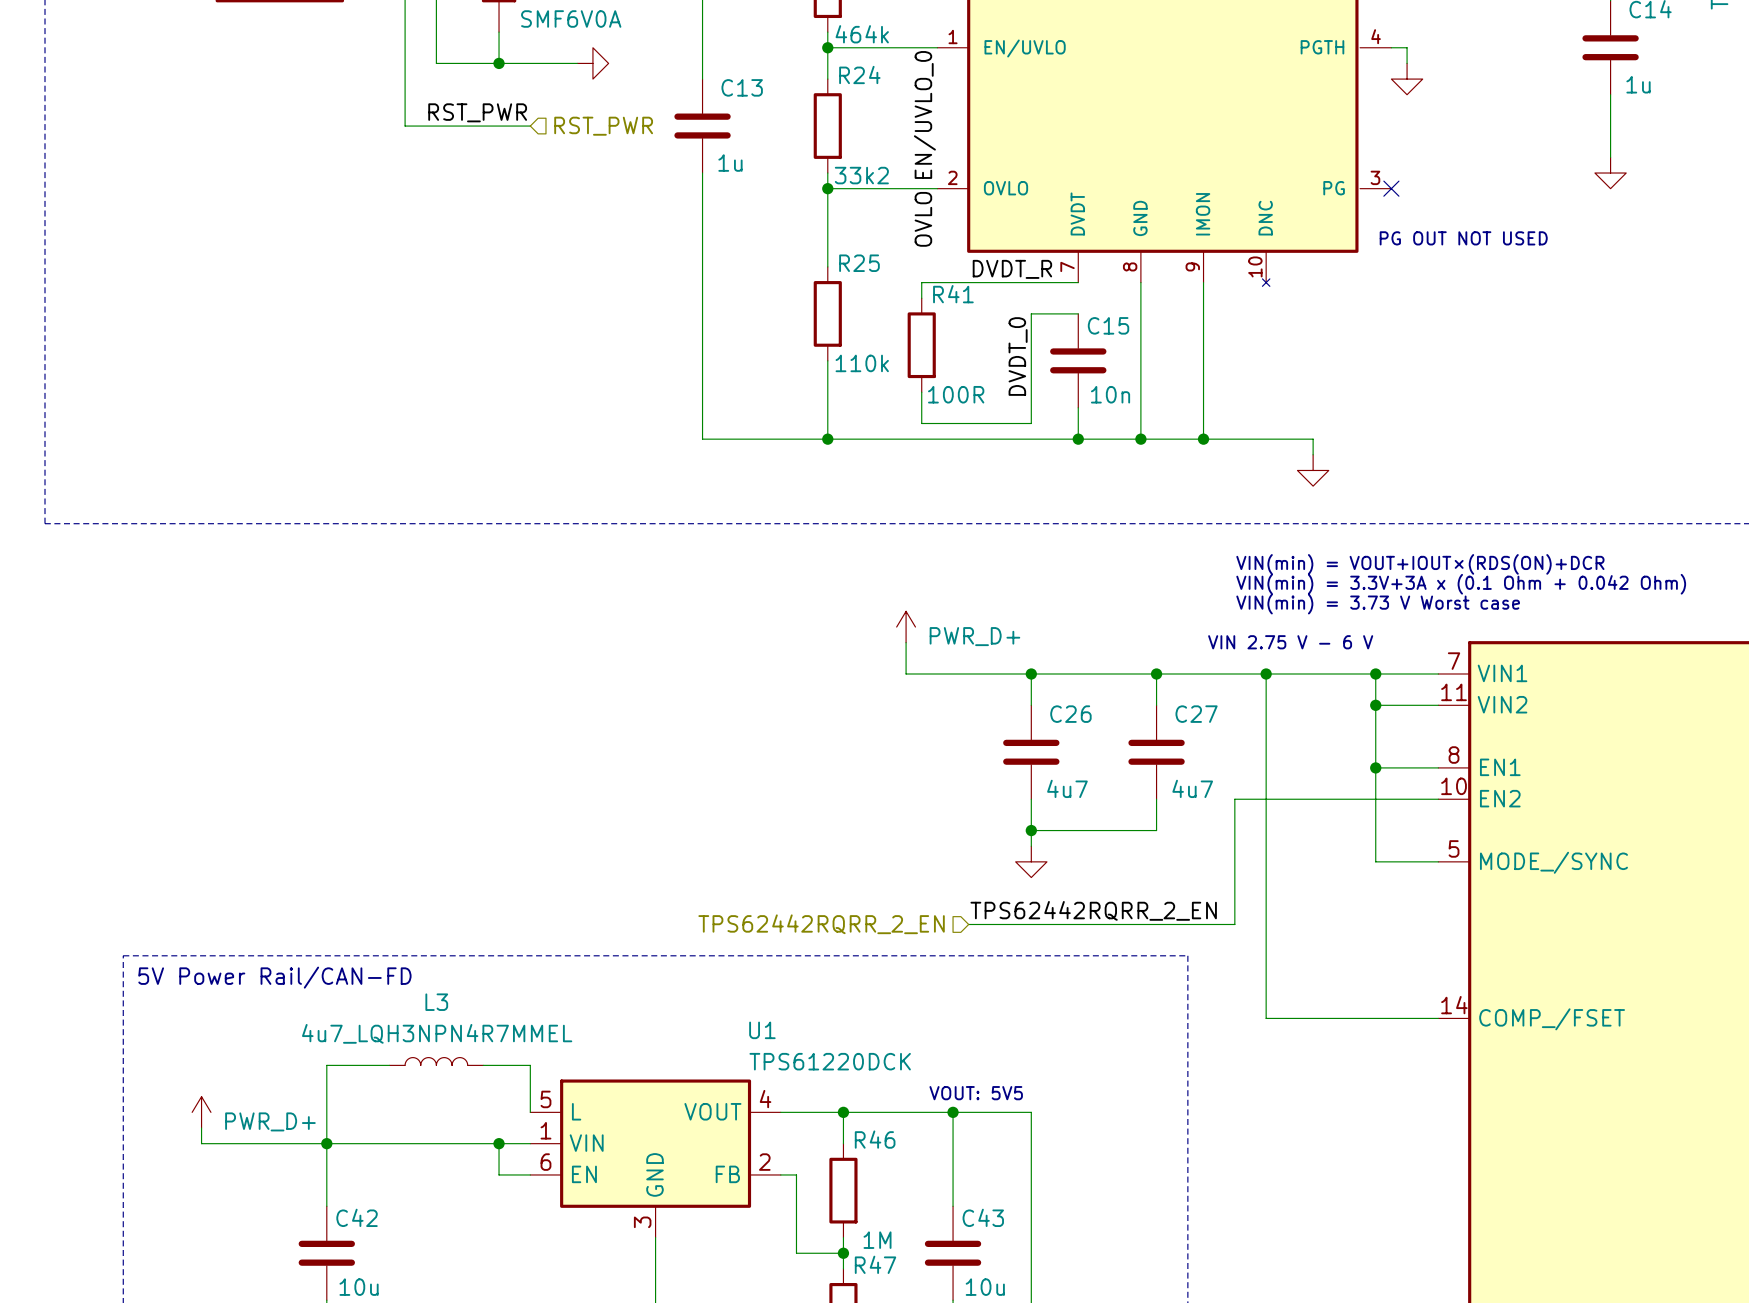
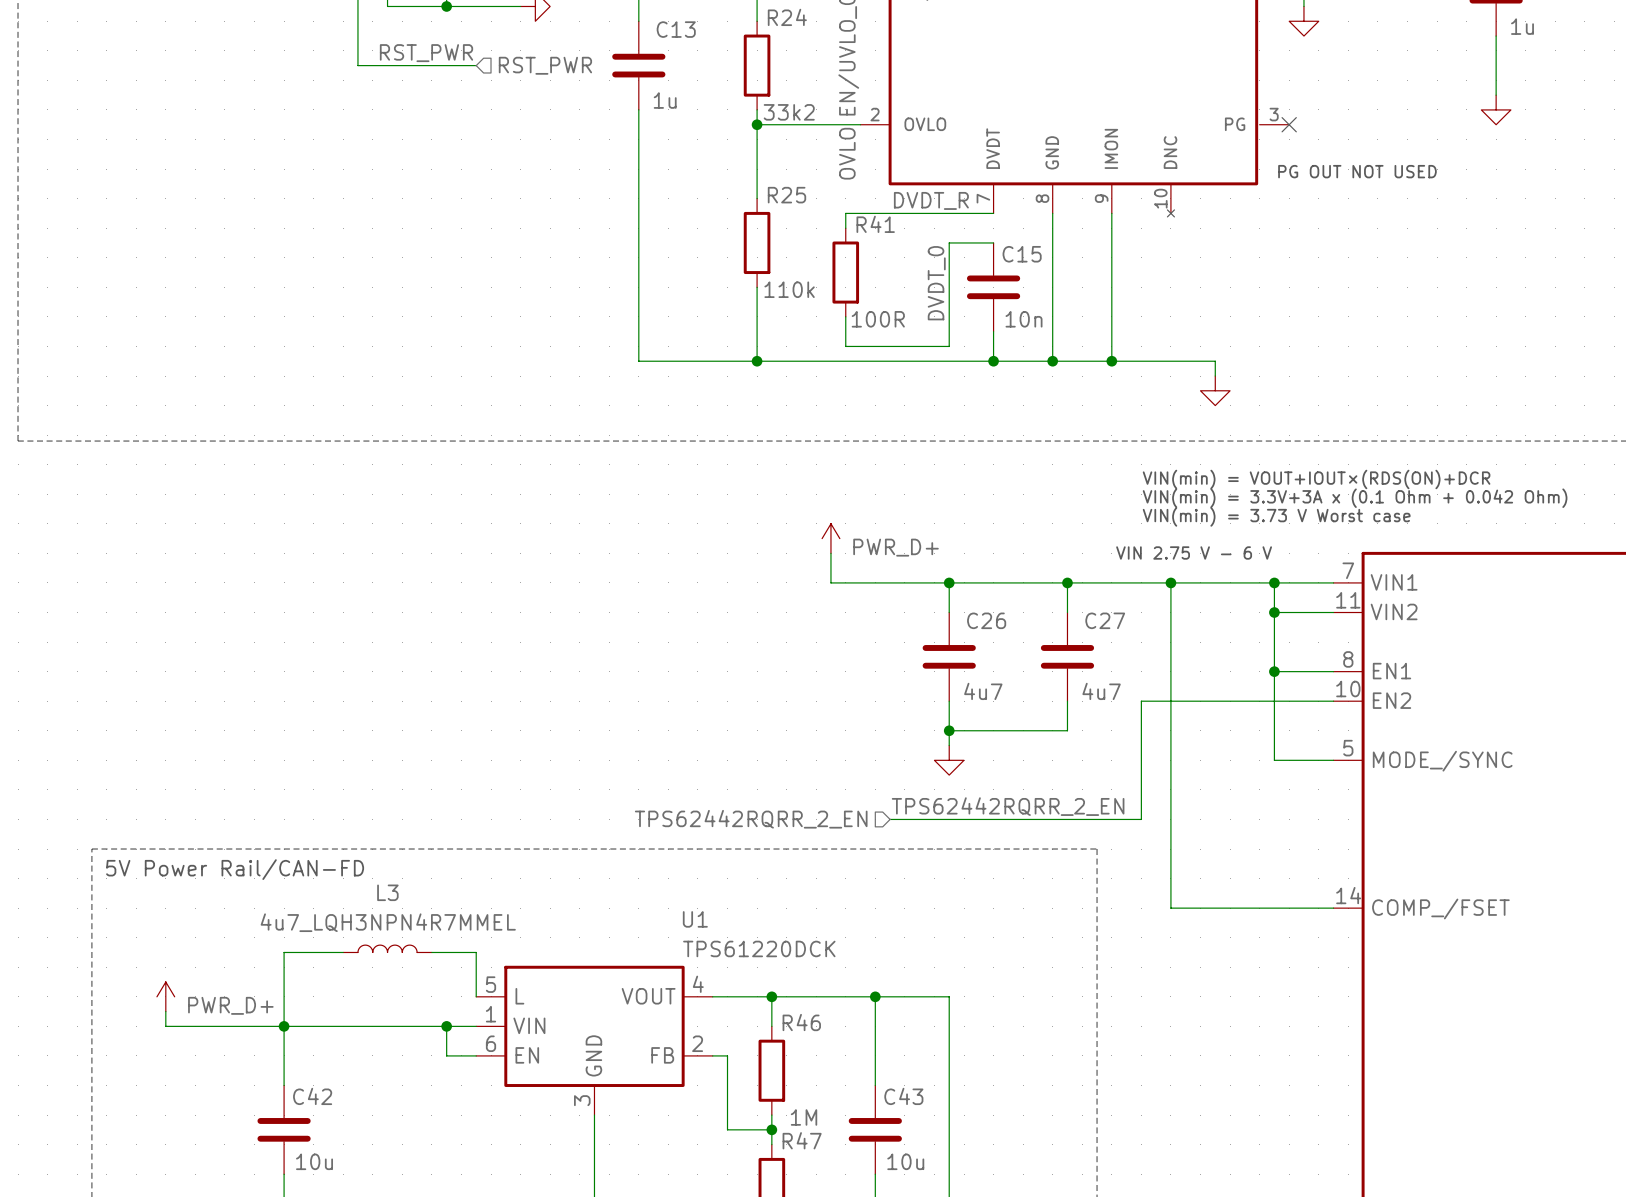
text: VOUT: 5V5 (976, 1093) -> none

